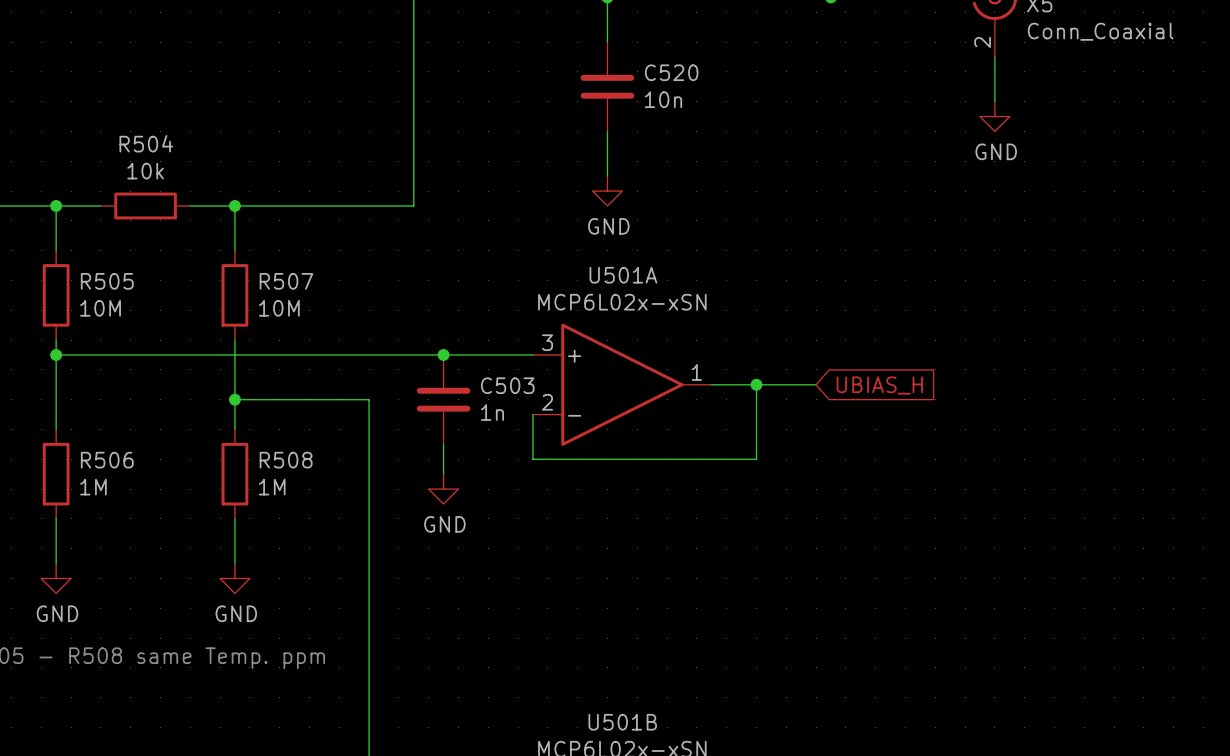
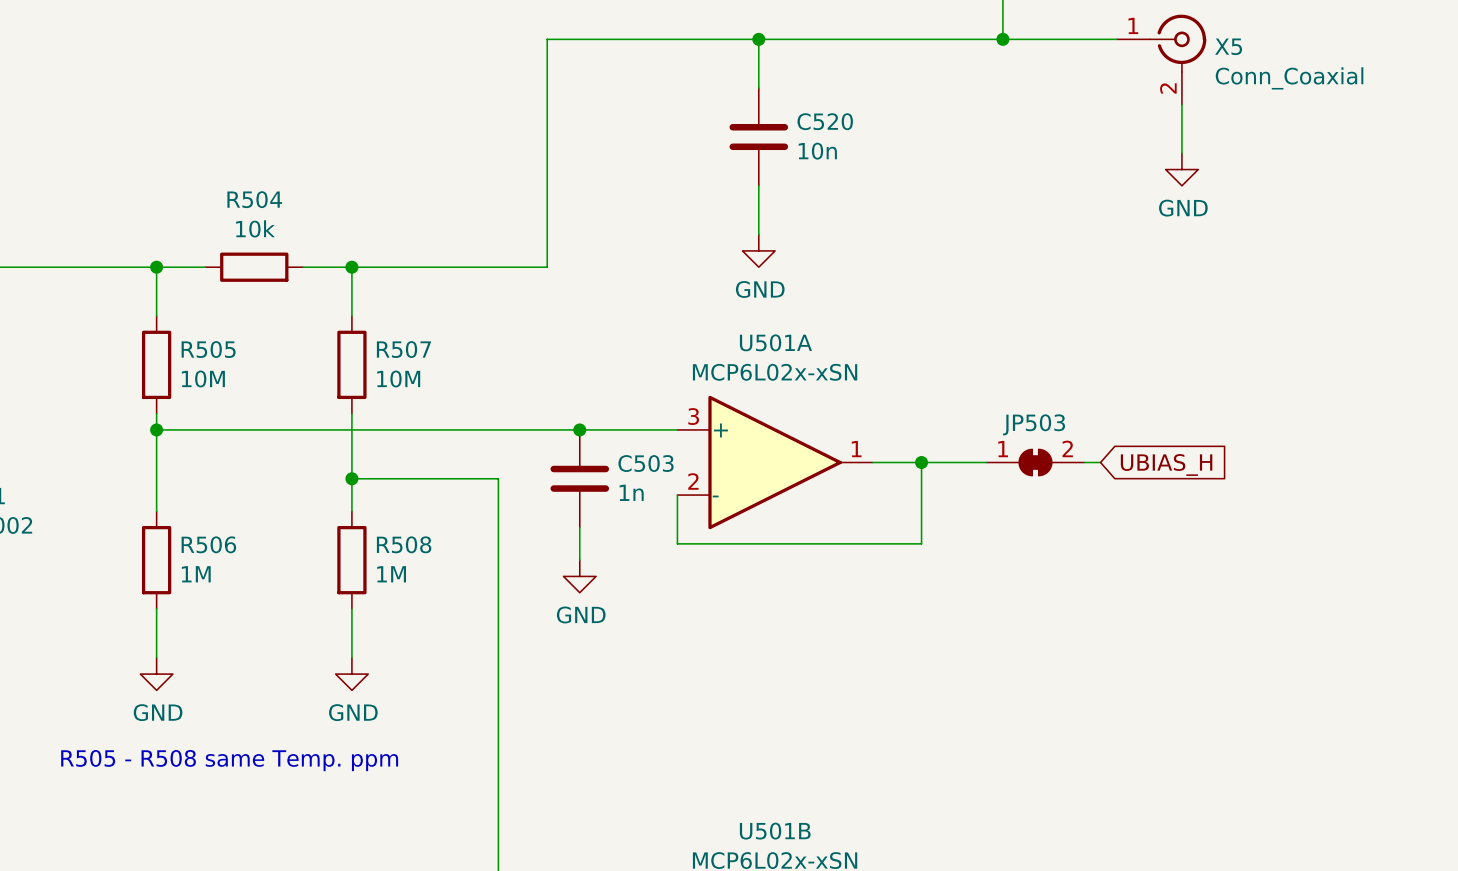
JP503: none -> (1035, 462)
wire: none -> (1084, 462) (1100, 462)
global label position: UBIAS_H (879, 385) -> UBIAS_H (1166, 464)

